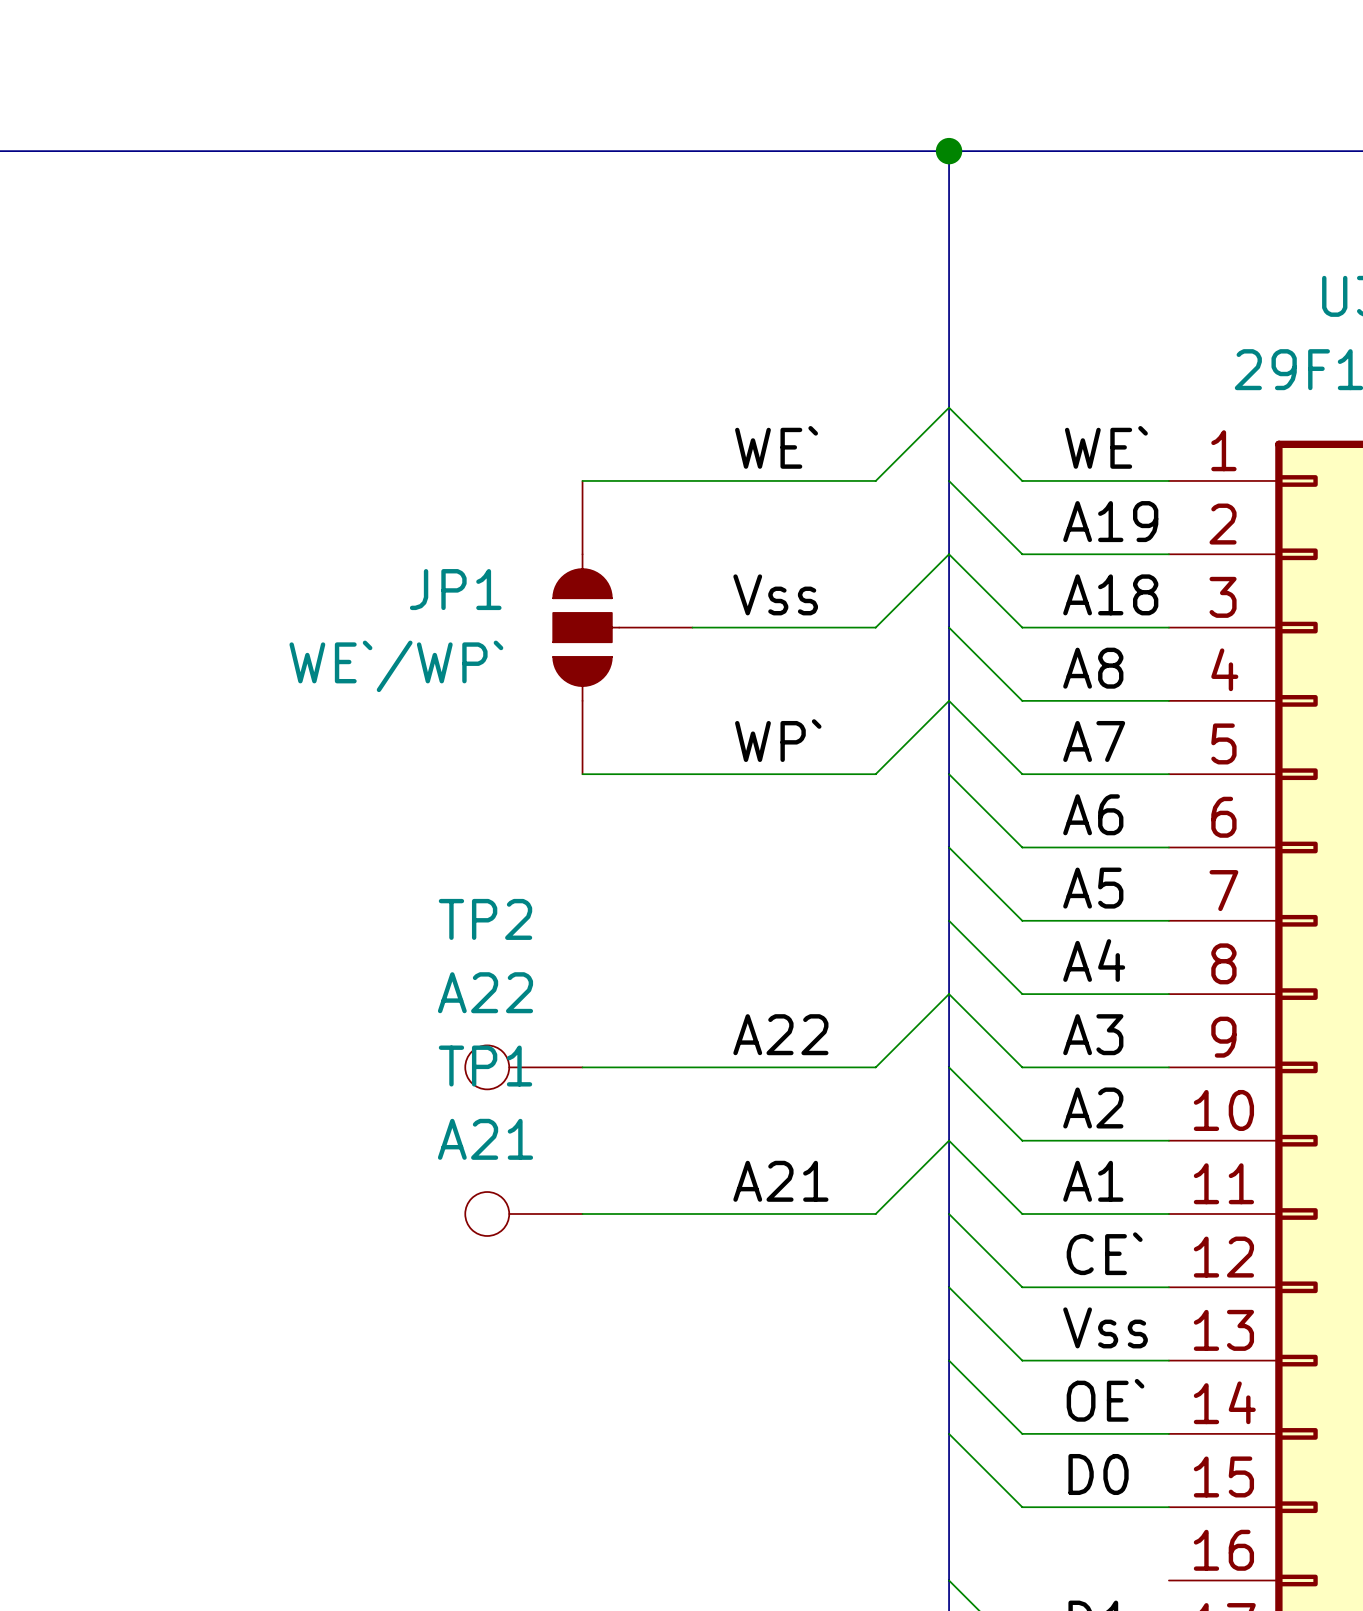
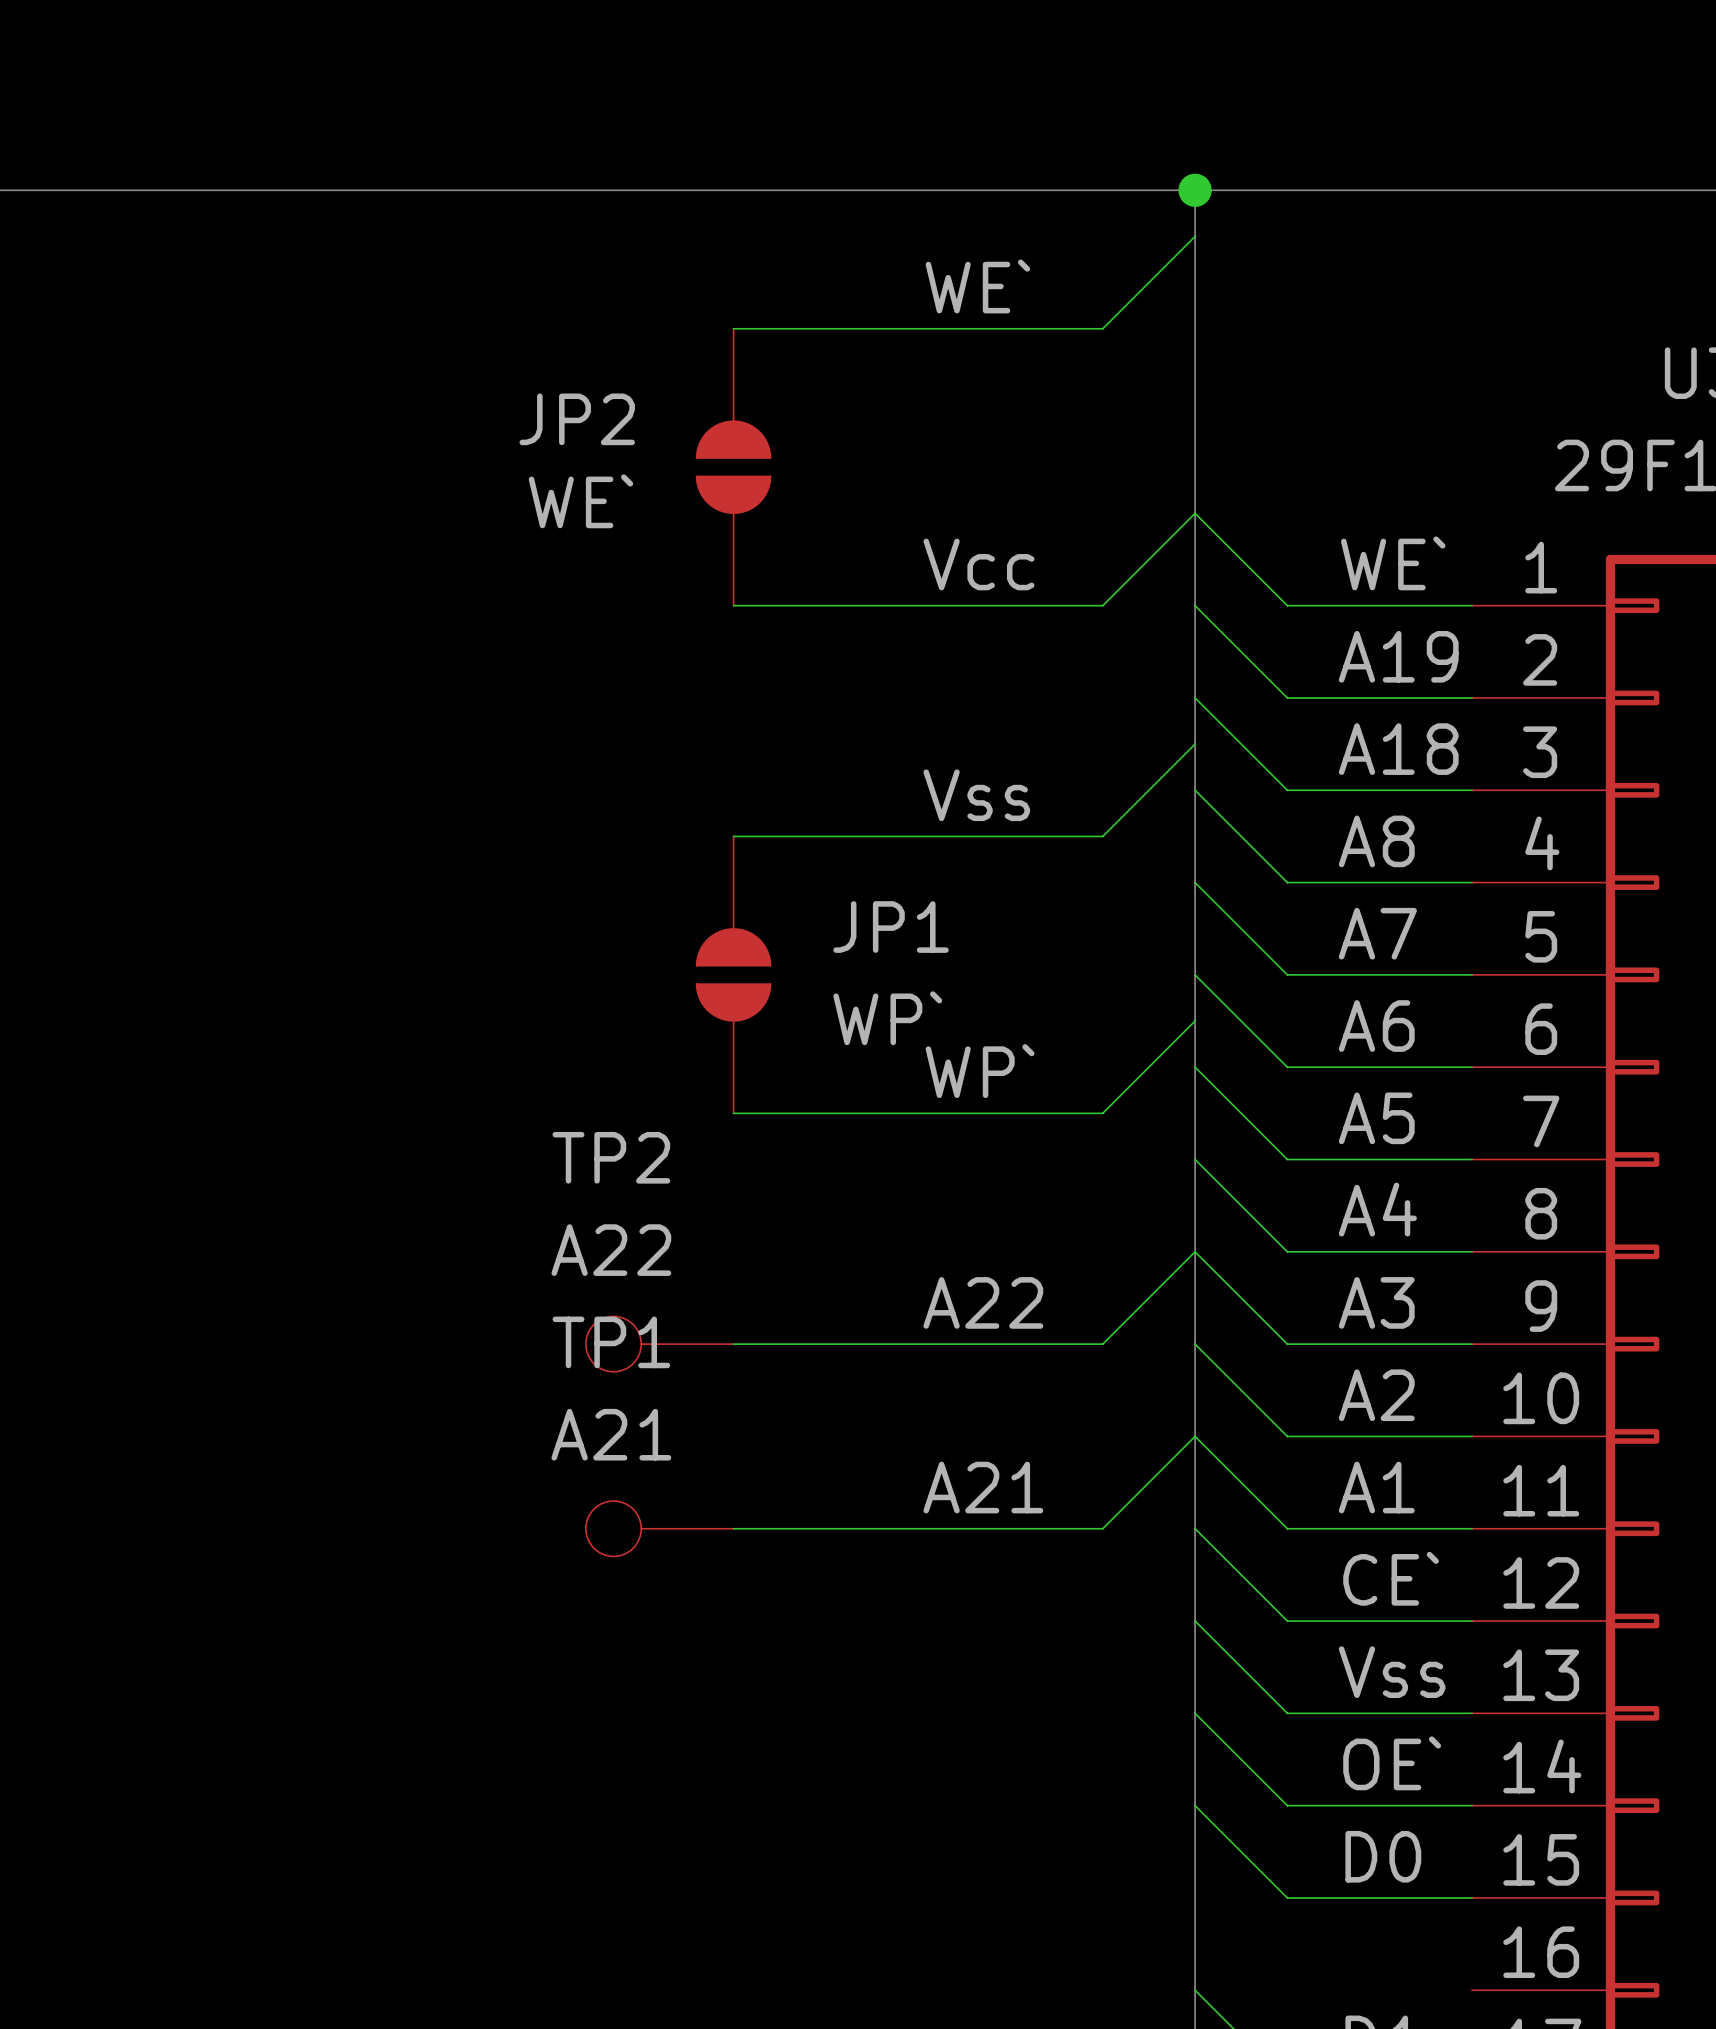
wire: none -> (1195, 236) (1102, 328) (733, 328)
label: none -> WE` (977, 286)
JP2: none -> WE` (733, 467)
label: WE` (776, 447) -> Vcc (978, 564)
JP1 symbol: [553, 480, 693, 775] -> [696, 836, 771, 1114]
wire: (949, 554) (875, 627) (692, 627) -> none
JP1 name position: JP1 (455, 589) -> JP1 (891, 927)
label position: Vss (775, 594) -> Vss (976, 795)
JP1 value: WE`/WP` (396, 666) -> WP` (887, 1018)
wire: (949, 700) (875, 774) (582, 774) -> (1195, 744) (1102, 836) (733, 836)
label position: WP` (778, 740) -> WP` (980, 1071)
wire: none -> (1195, 1021) (1102, 1113) (733, 1113)

